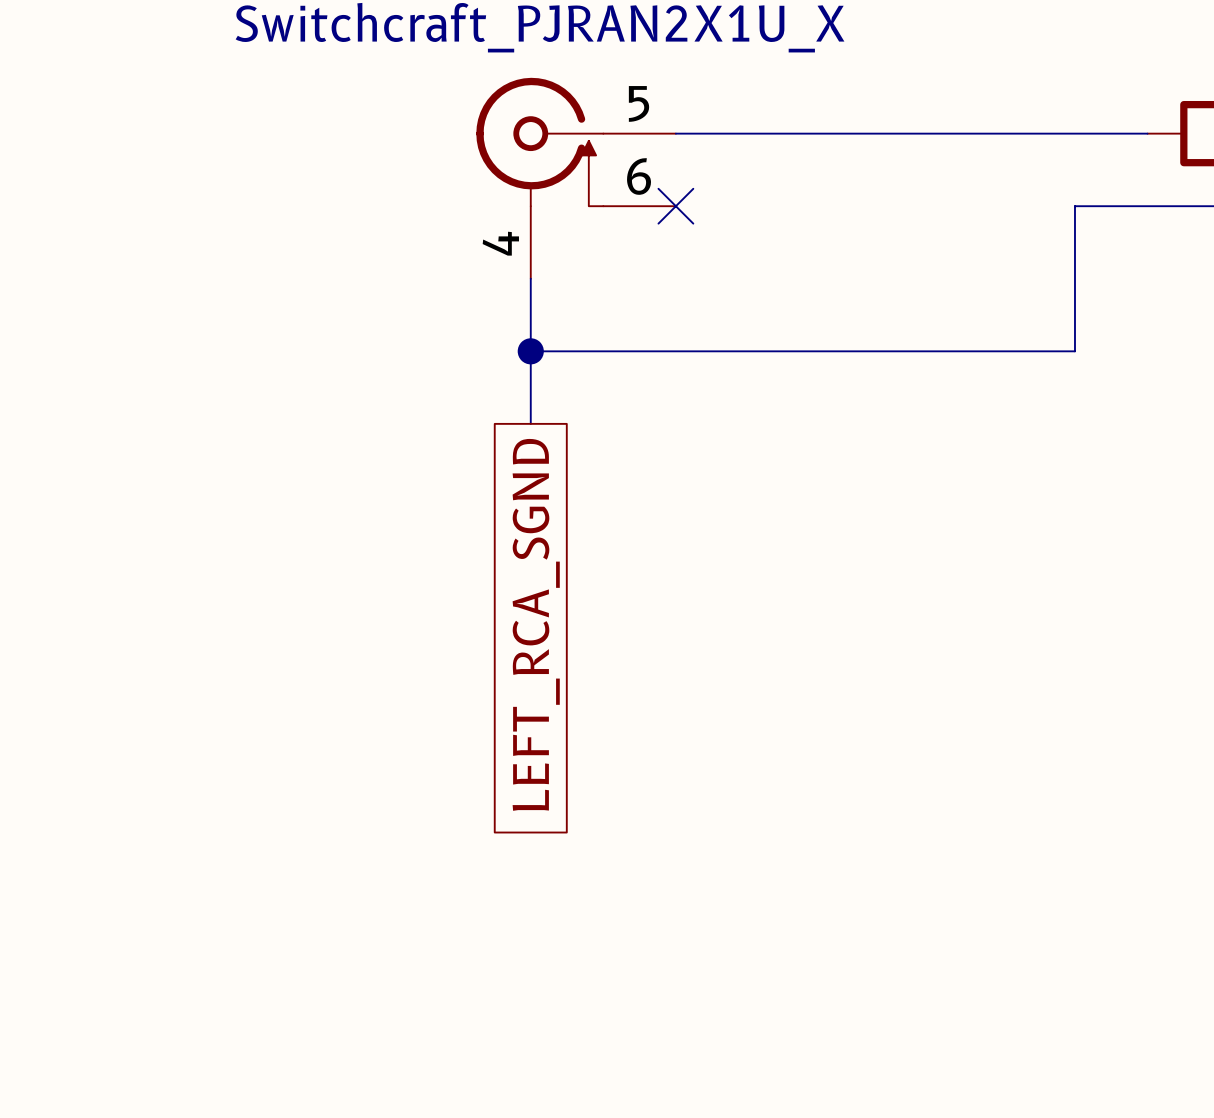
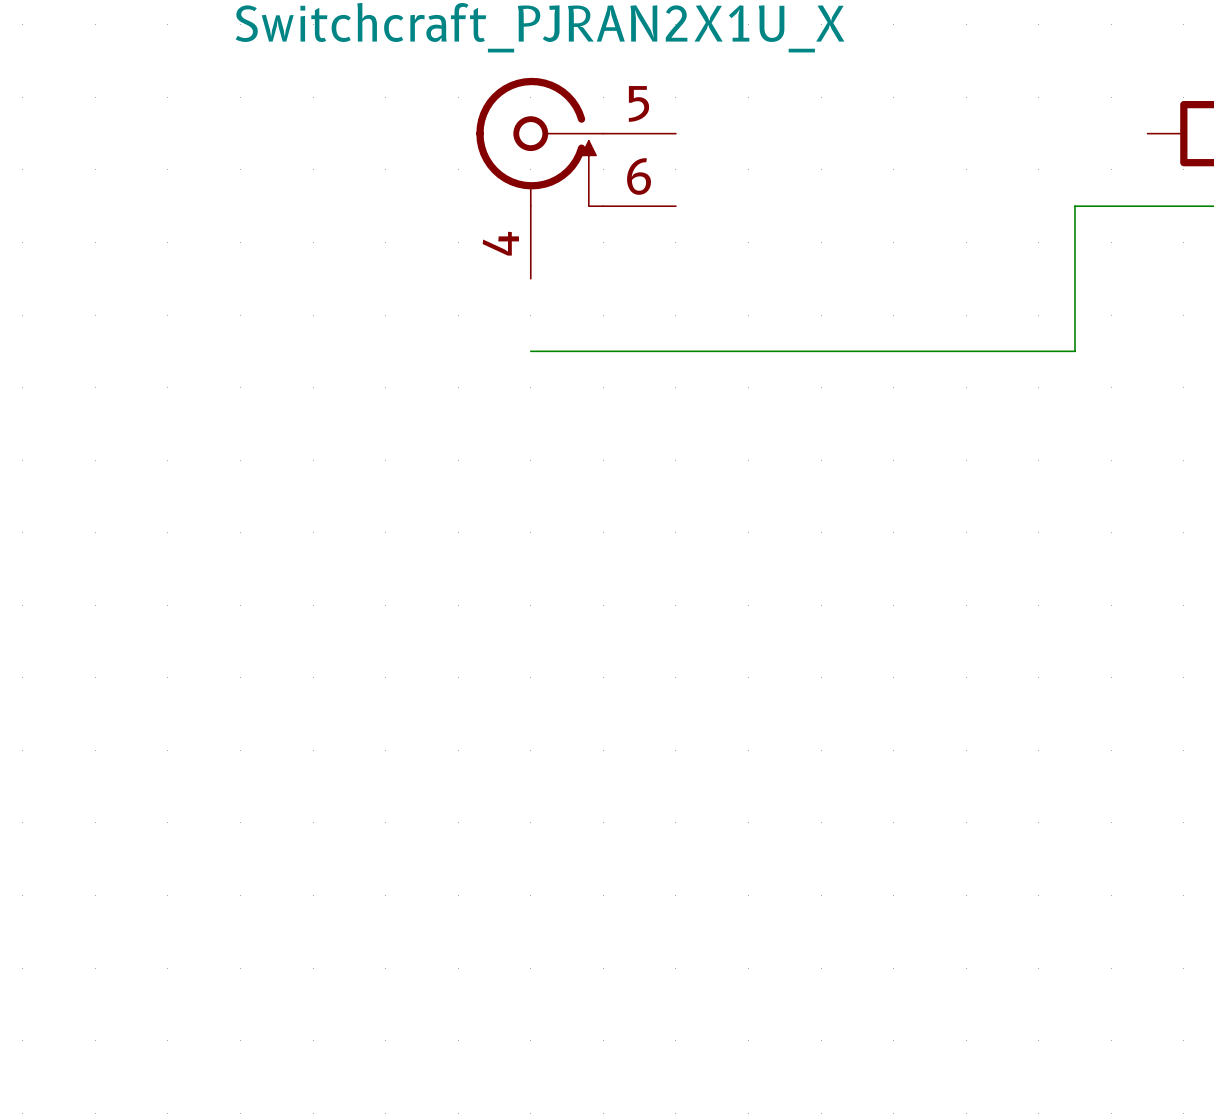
wire: (675, 133) (1147, 133) -> none
no-connect mark: (675, 206) -> none
wire: (530, 278) (530, 423) -> none
junction: (530, 351) -> none
global label: LEFT_RCA_SGND (536, 624) -> none

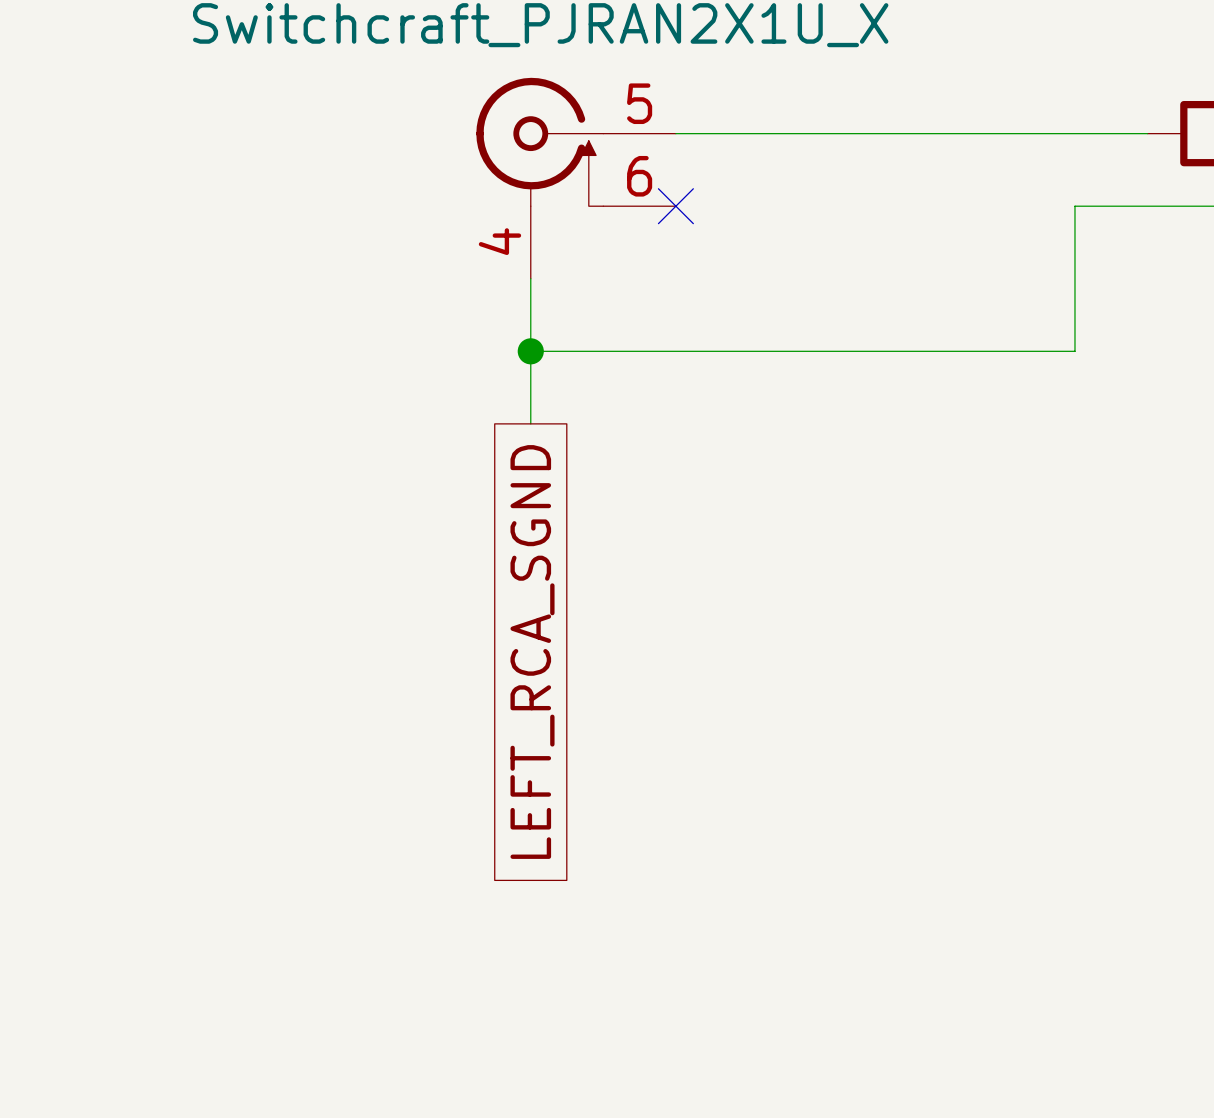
wire: none -> (675, 133) (1147, 133)
no-connect mark: none -> (675, 206)
wire: none -> (530, 278) (530, 423)
junction: none -> (530, 351)
global label: none -> LEFT_RCA_SGND (532, 652)

